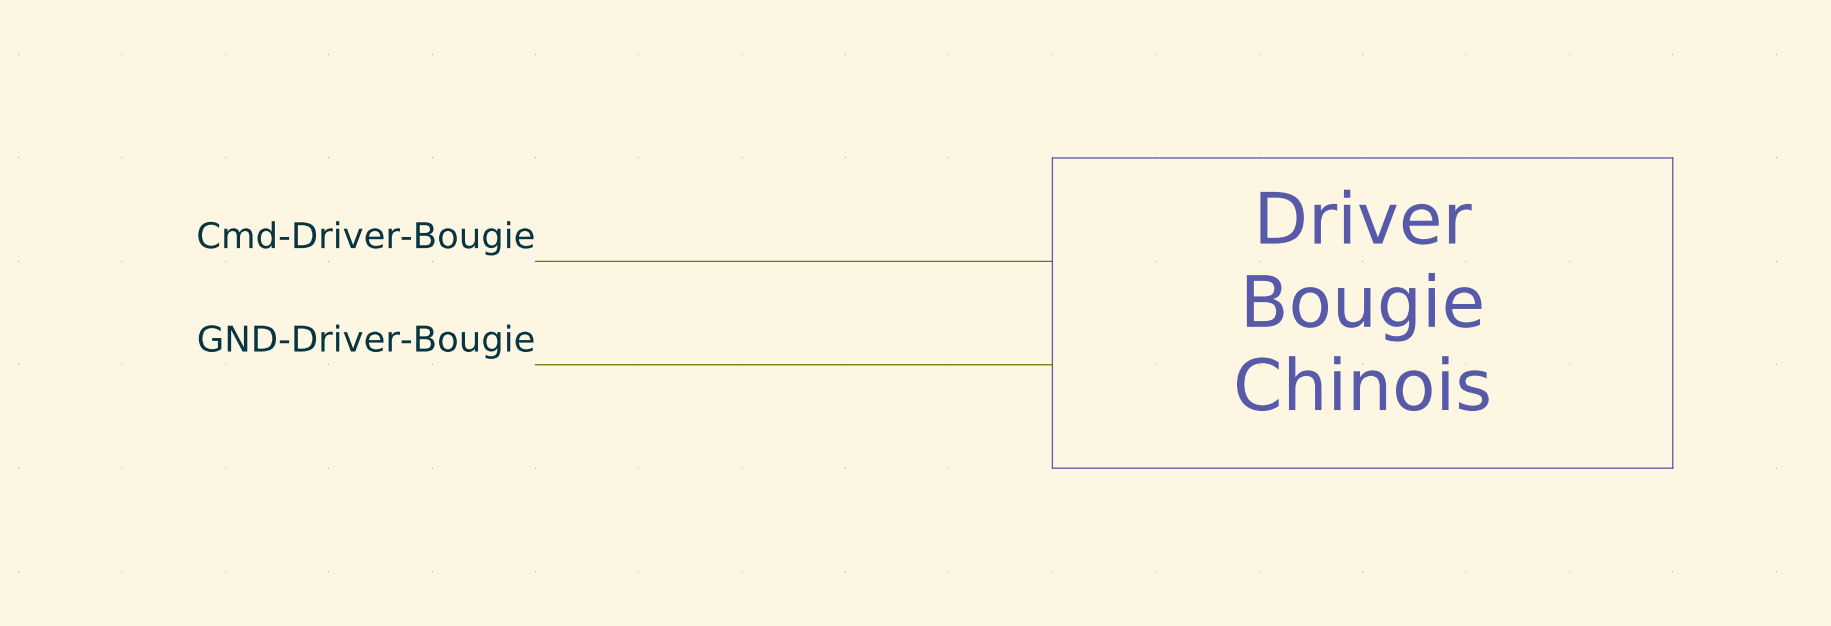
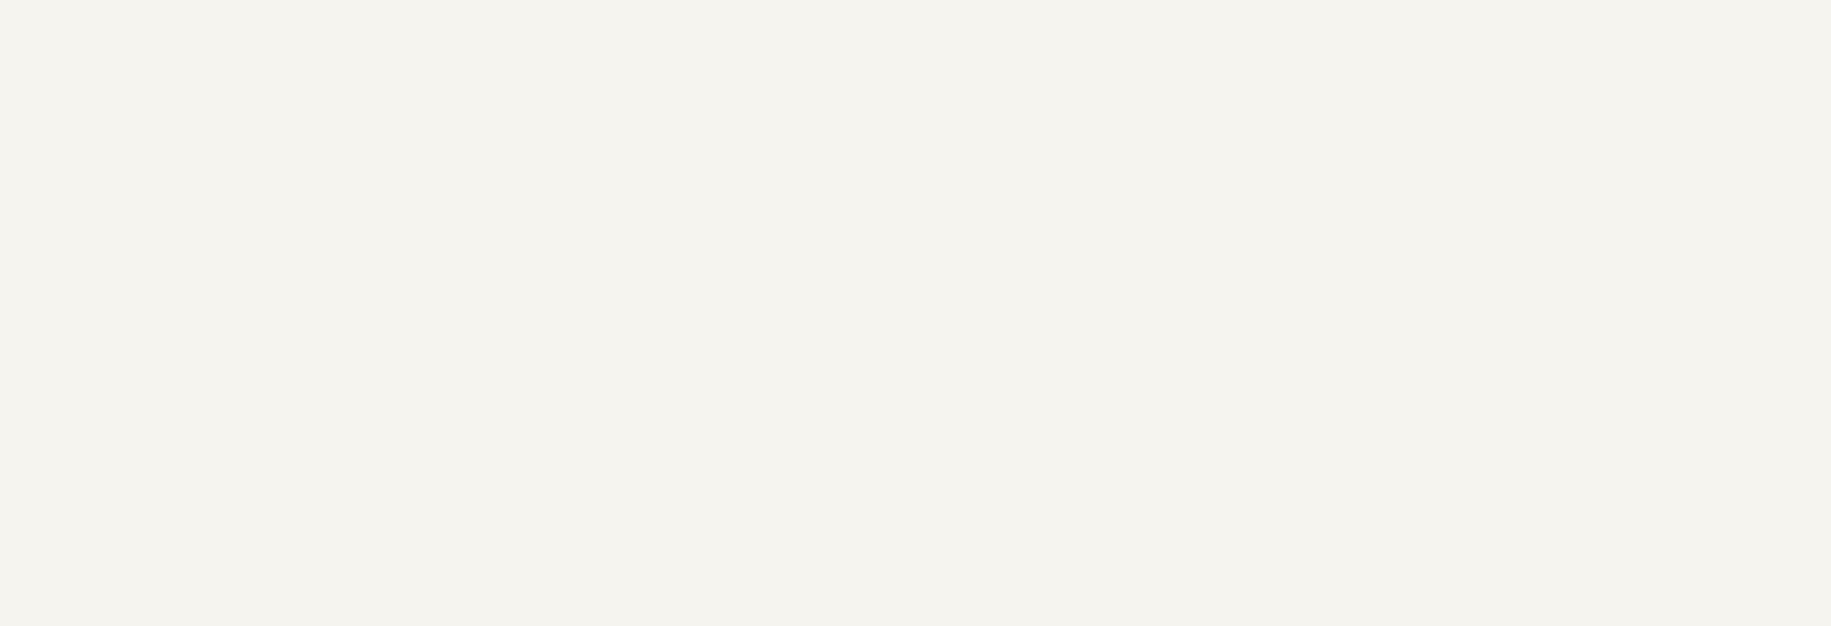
line: (1052, 157) (1672, 157) (1672, 468) (1052, 468) (1052, 157) -> none
text: Driver (1366, 217) -> none
label: Cmd-Driver-Bougie (365, 238) -> none
wire: (535, 261) (1052, 261) -> none
text: Bougie (1364, 307) -> none
label: GND-Driver-Bougie (366, 341) -> none
wire: (535, 364) (1052, 364) -> none
text: Chinois (1362, 383) -> none

